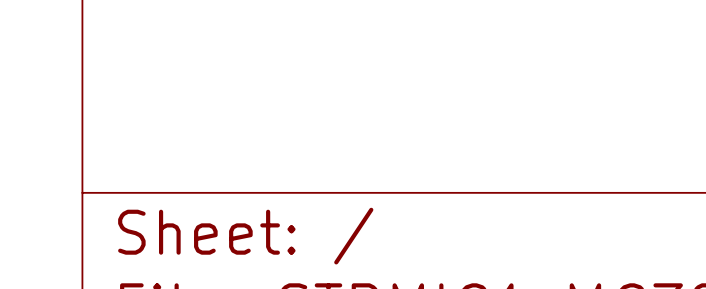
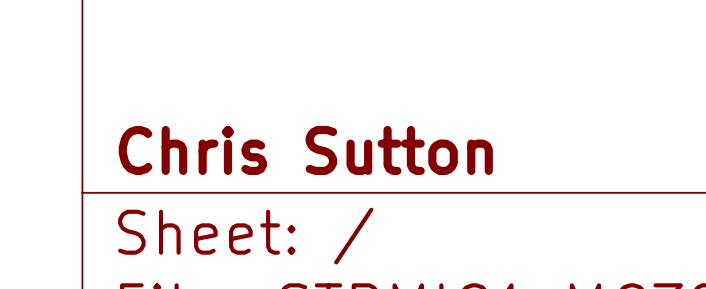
title block: none -> Chris Sutton (305, 150)

